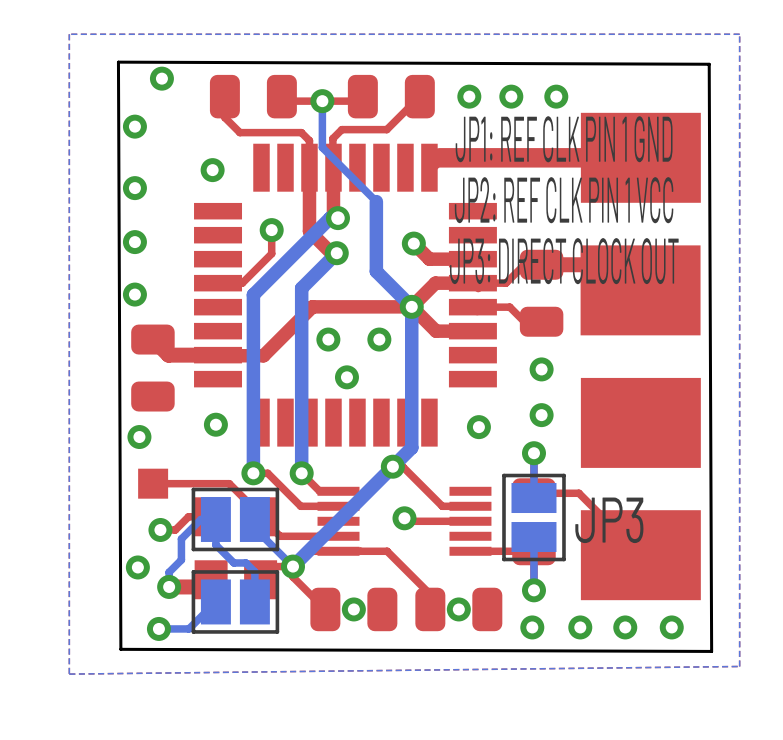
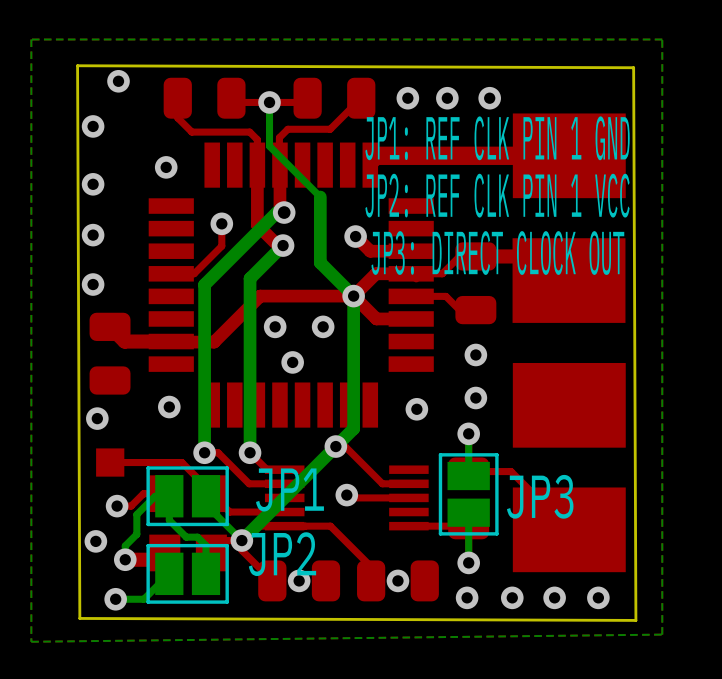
text: none -> JP1 (289, 489)
text: none -> JP2 (282, 554)

